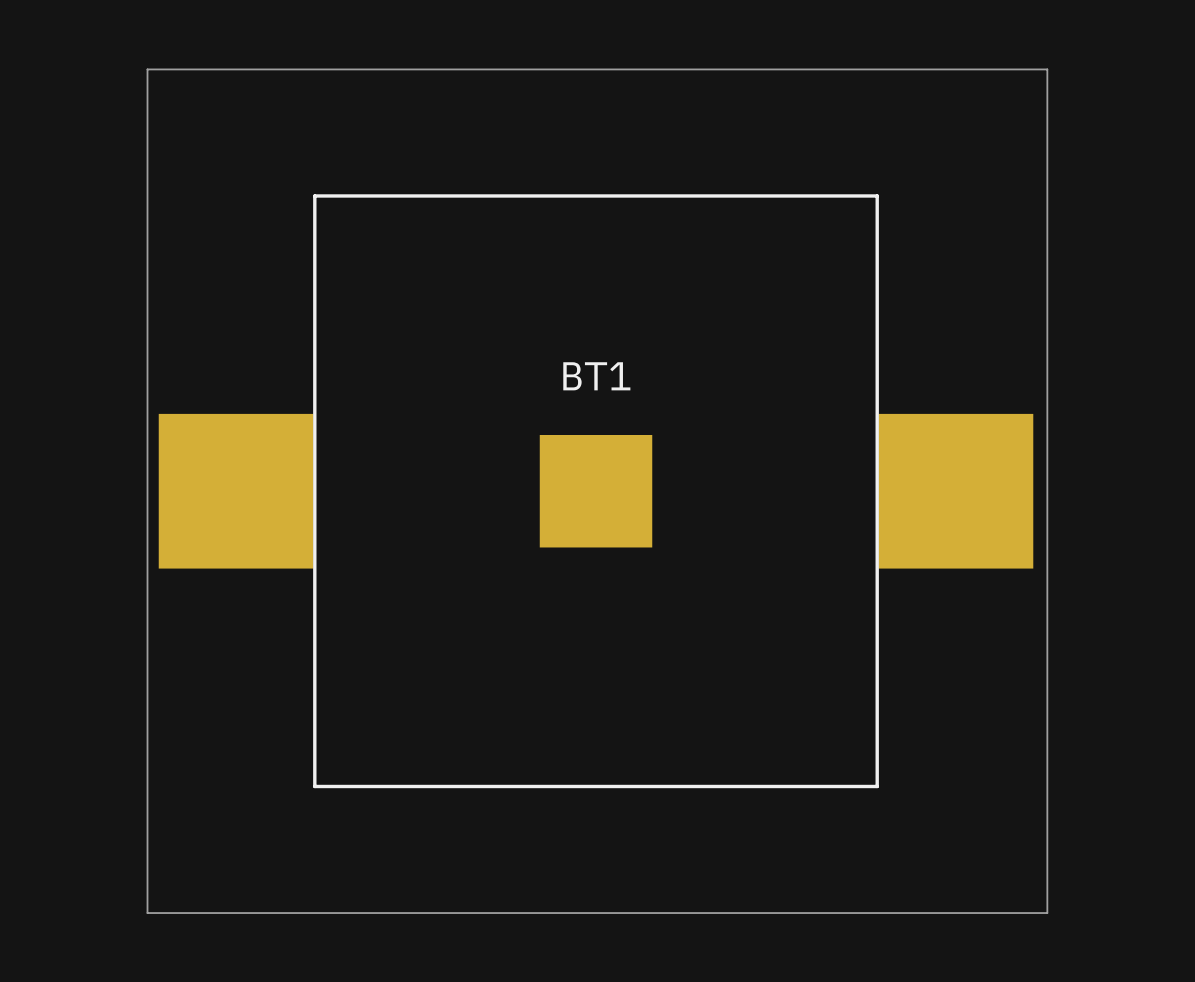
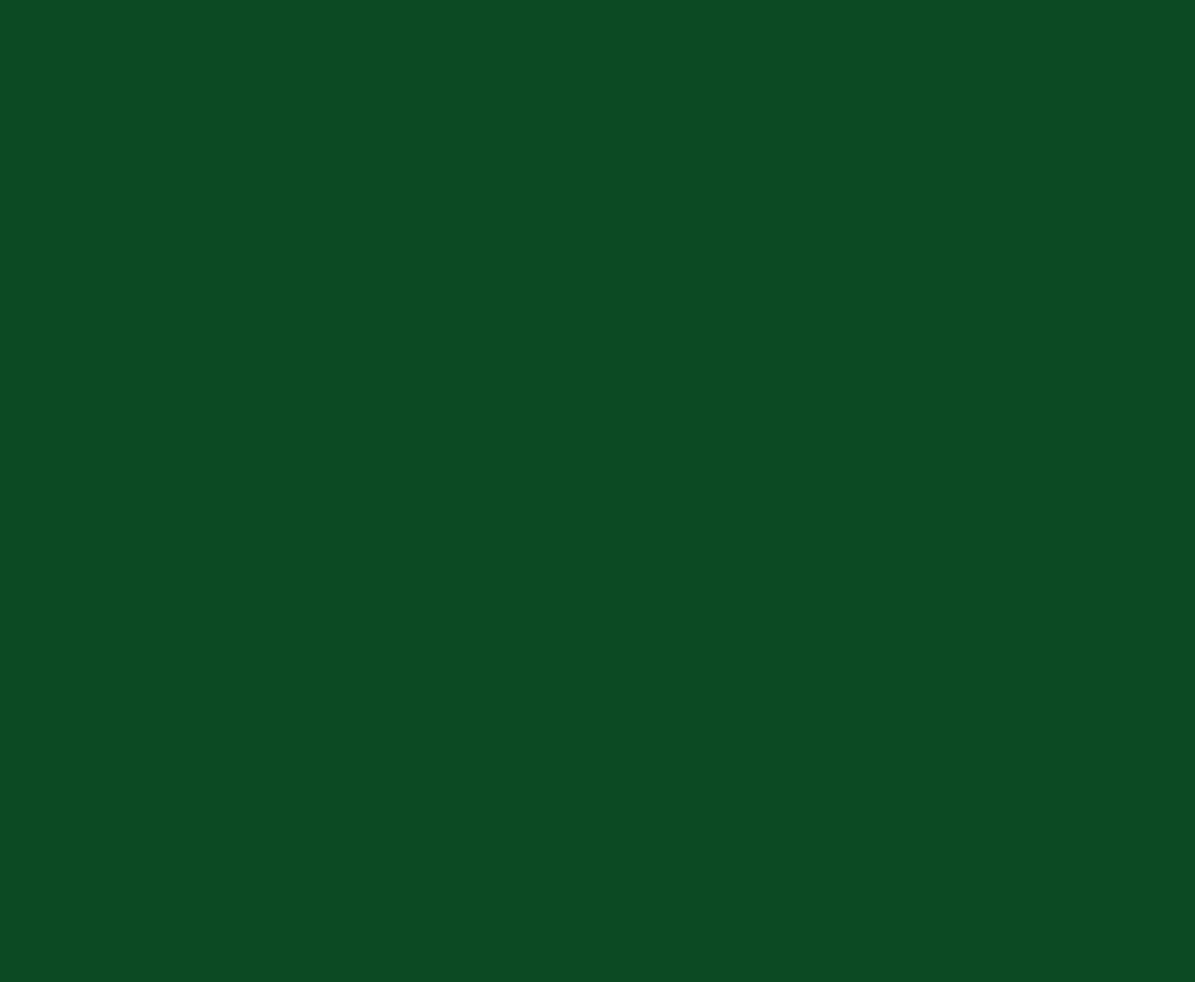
board edge: (1047, 69) (147, 69) (147, 913) (1047, 913) (1047, 69) -> none
BT1: (596, 491) -> none

